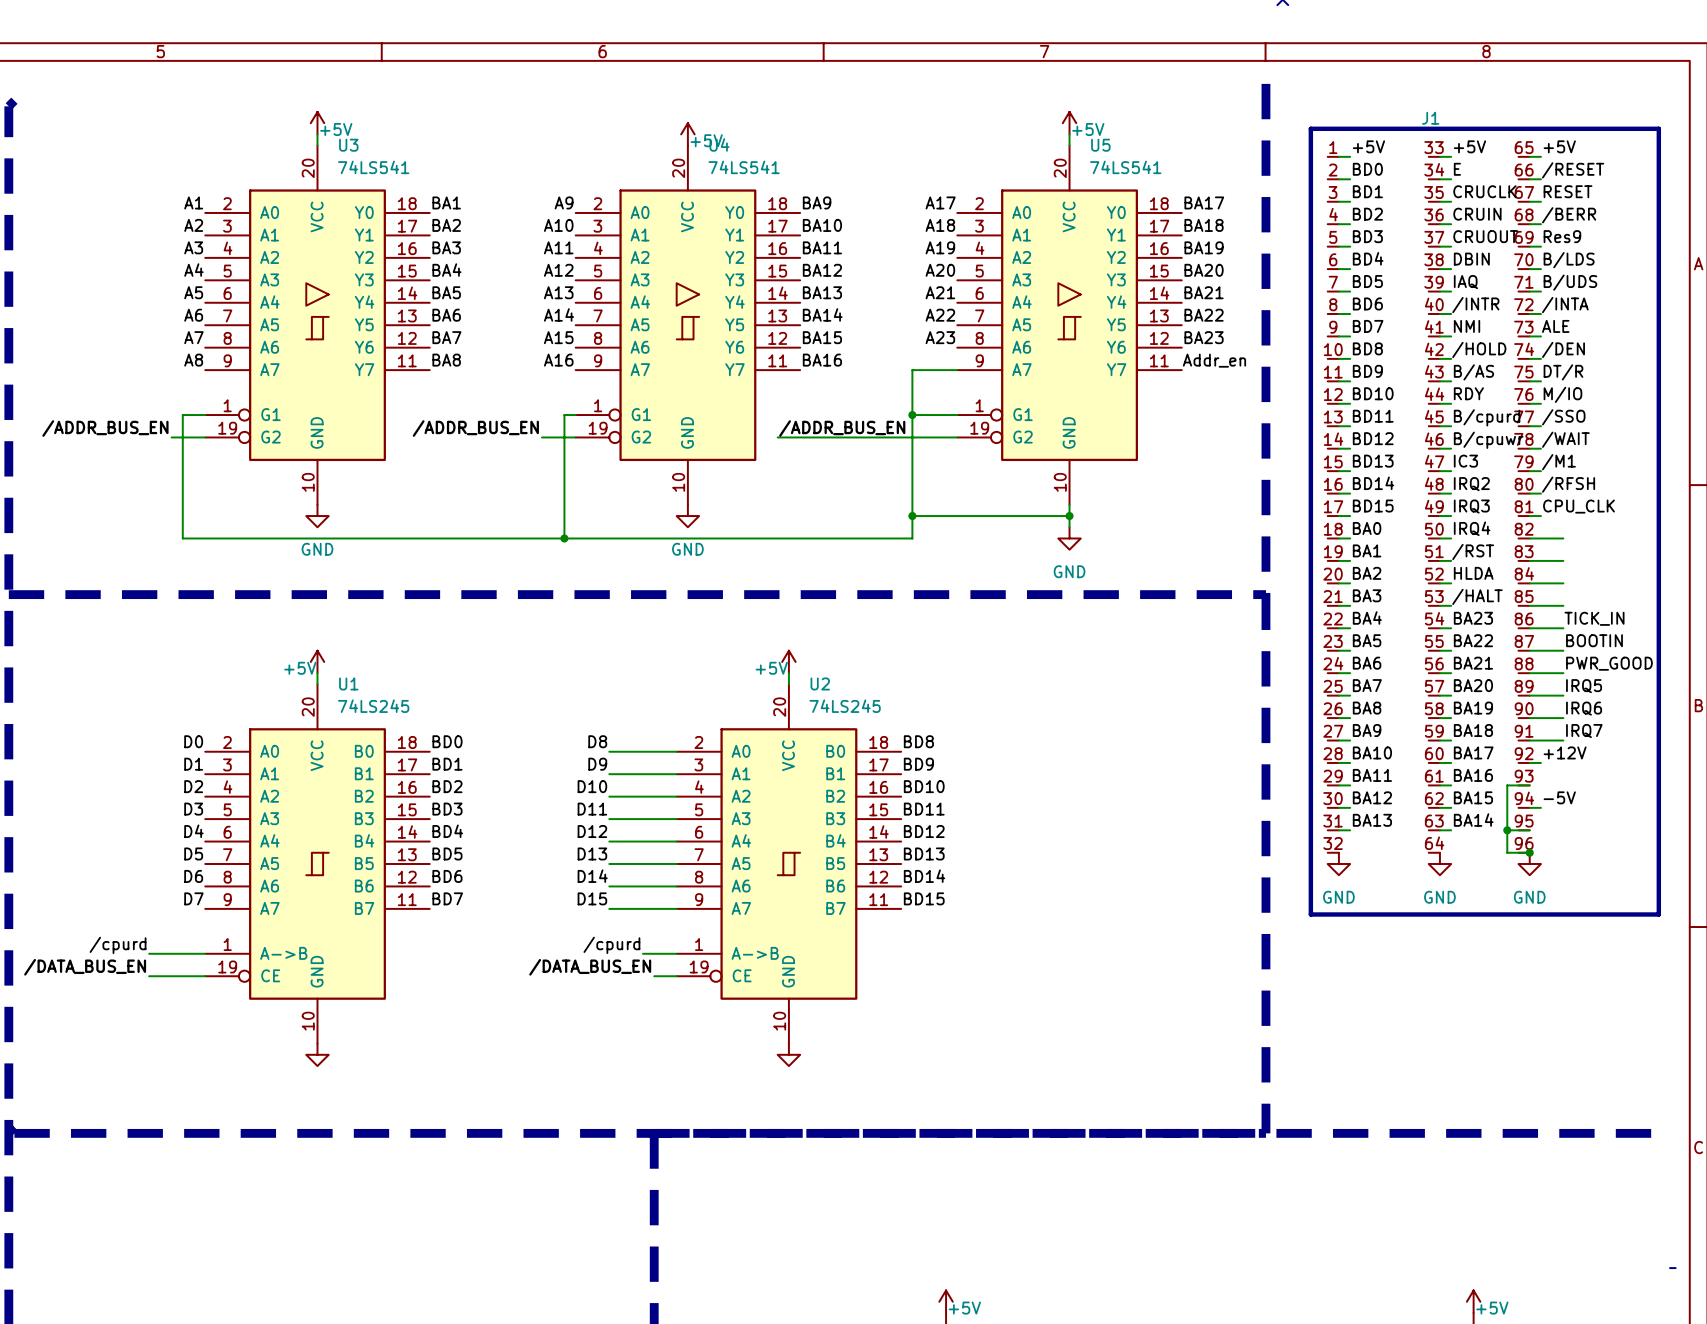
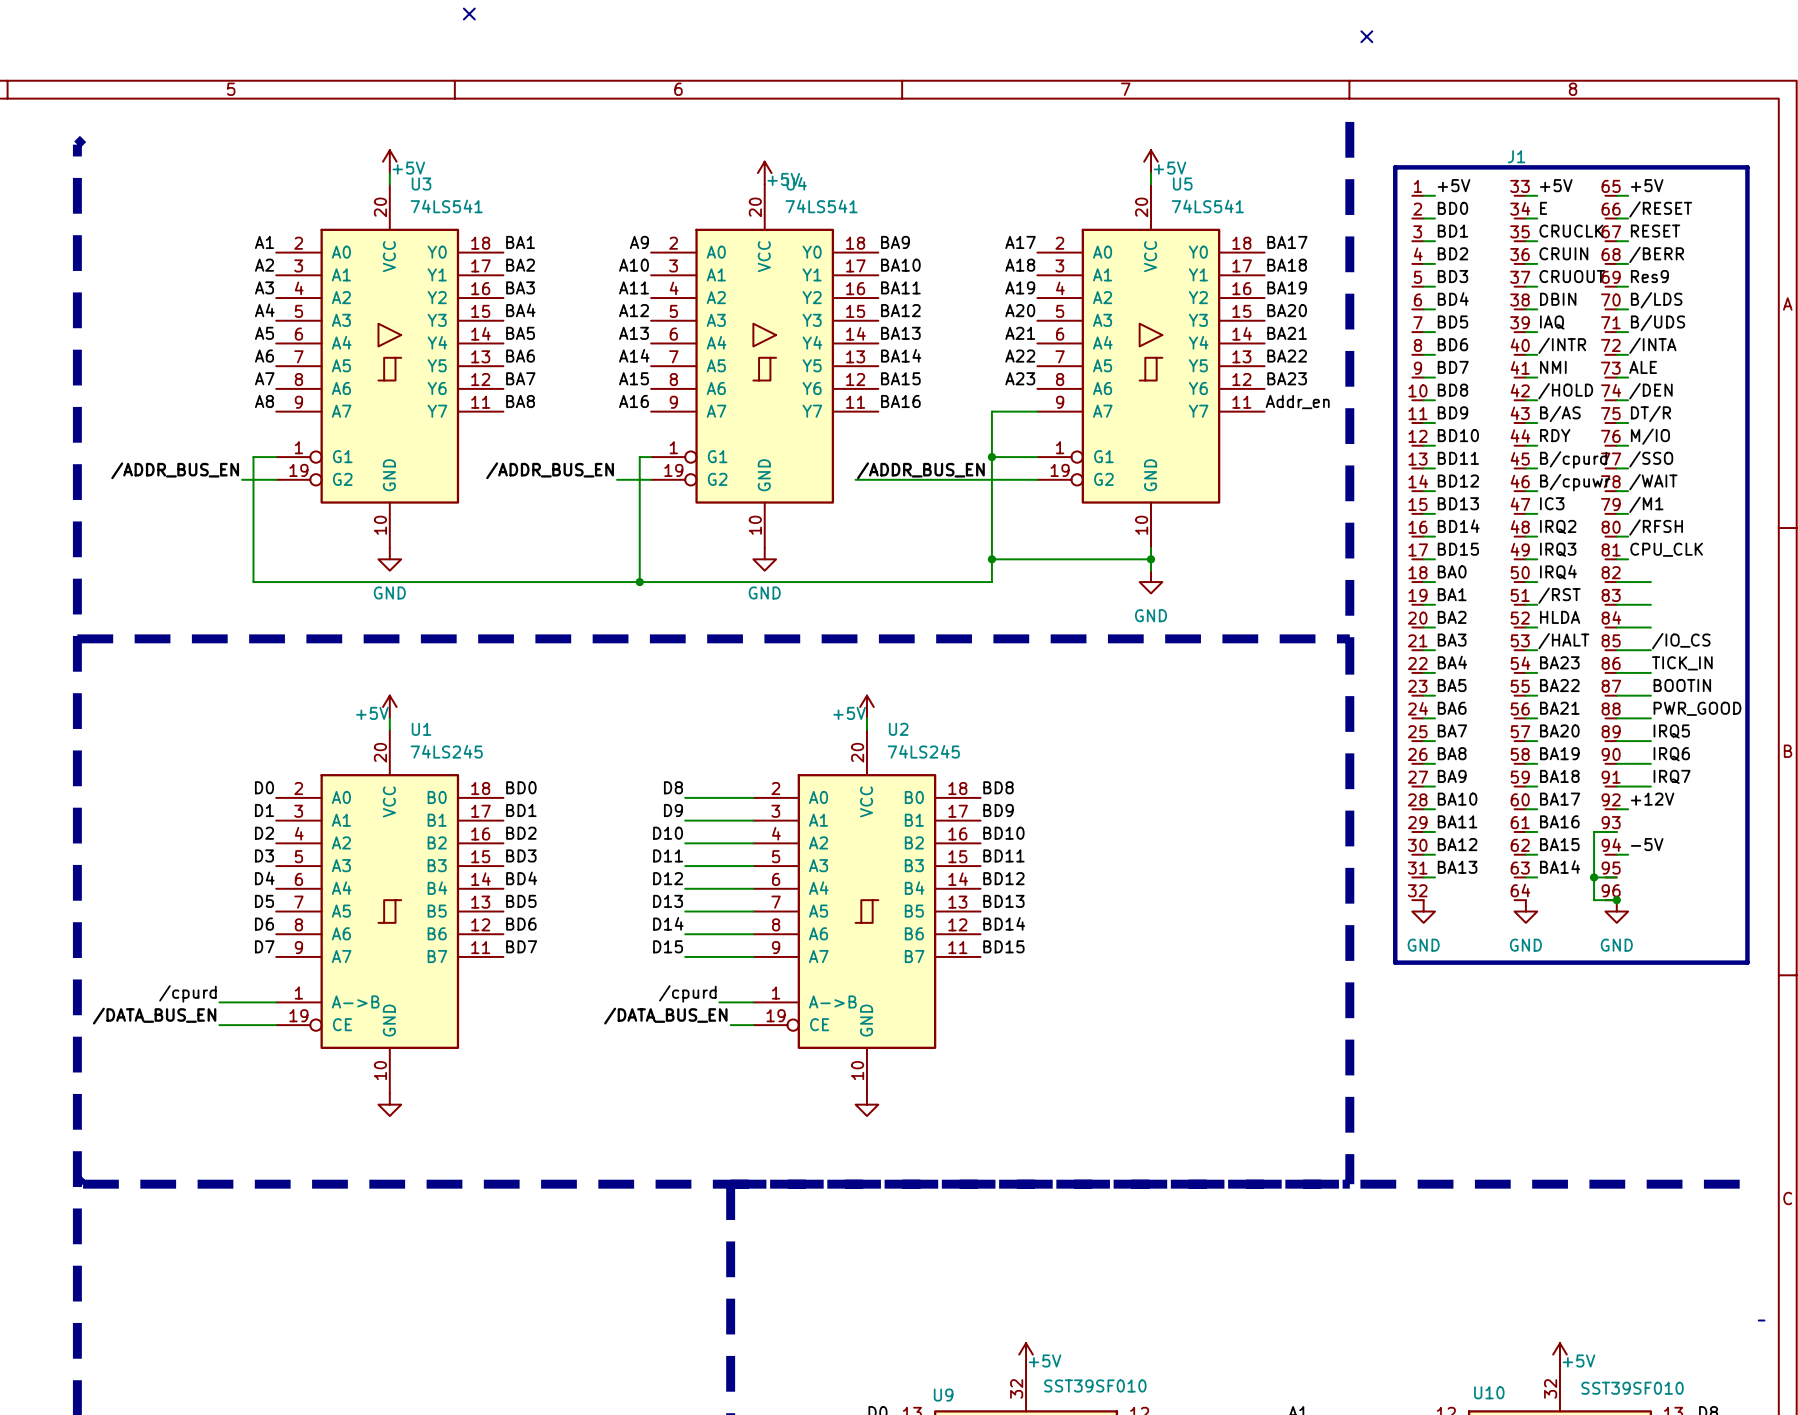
label: none -> /IO_CS (1681, 641)

